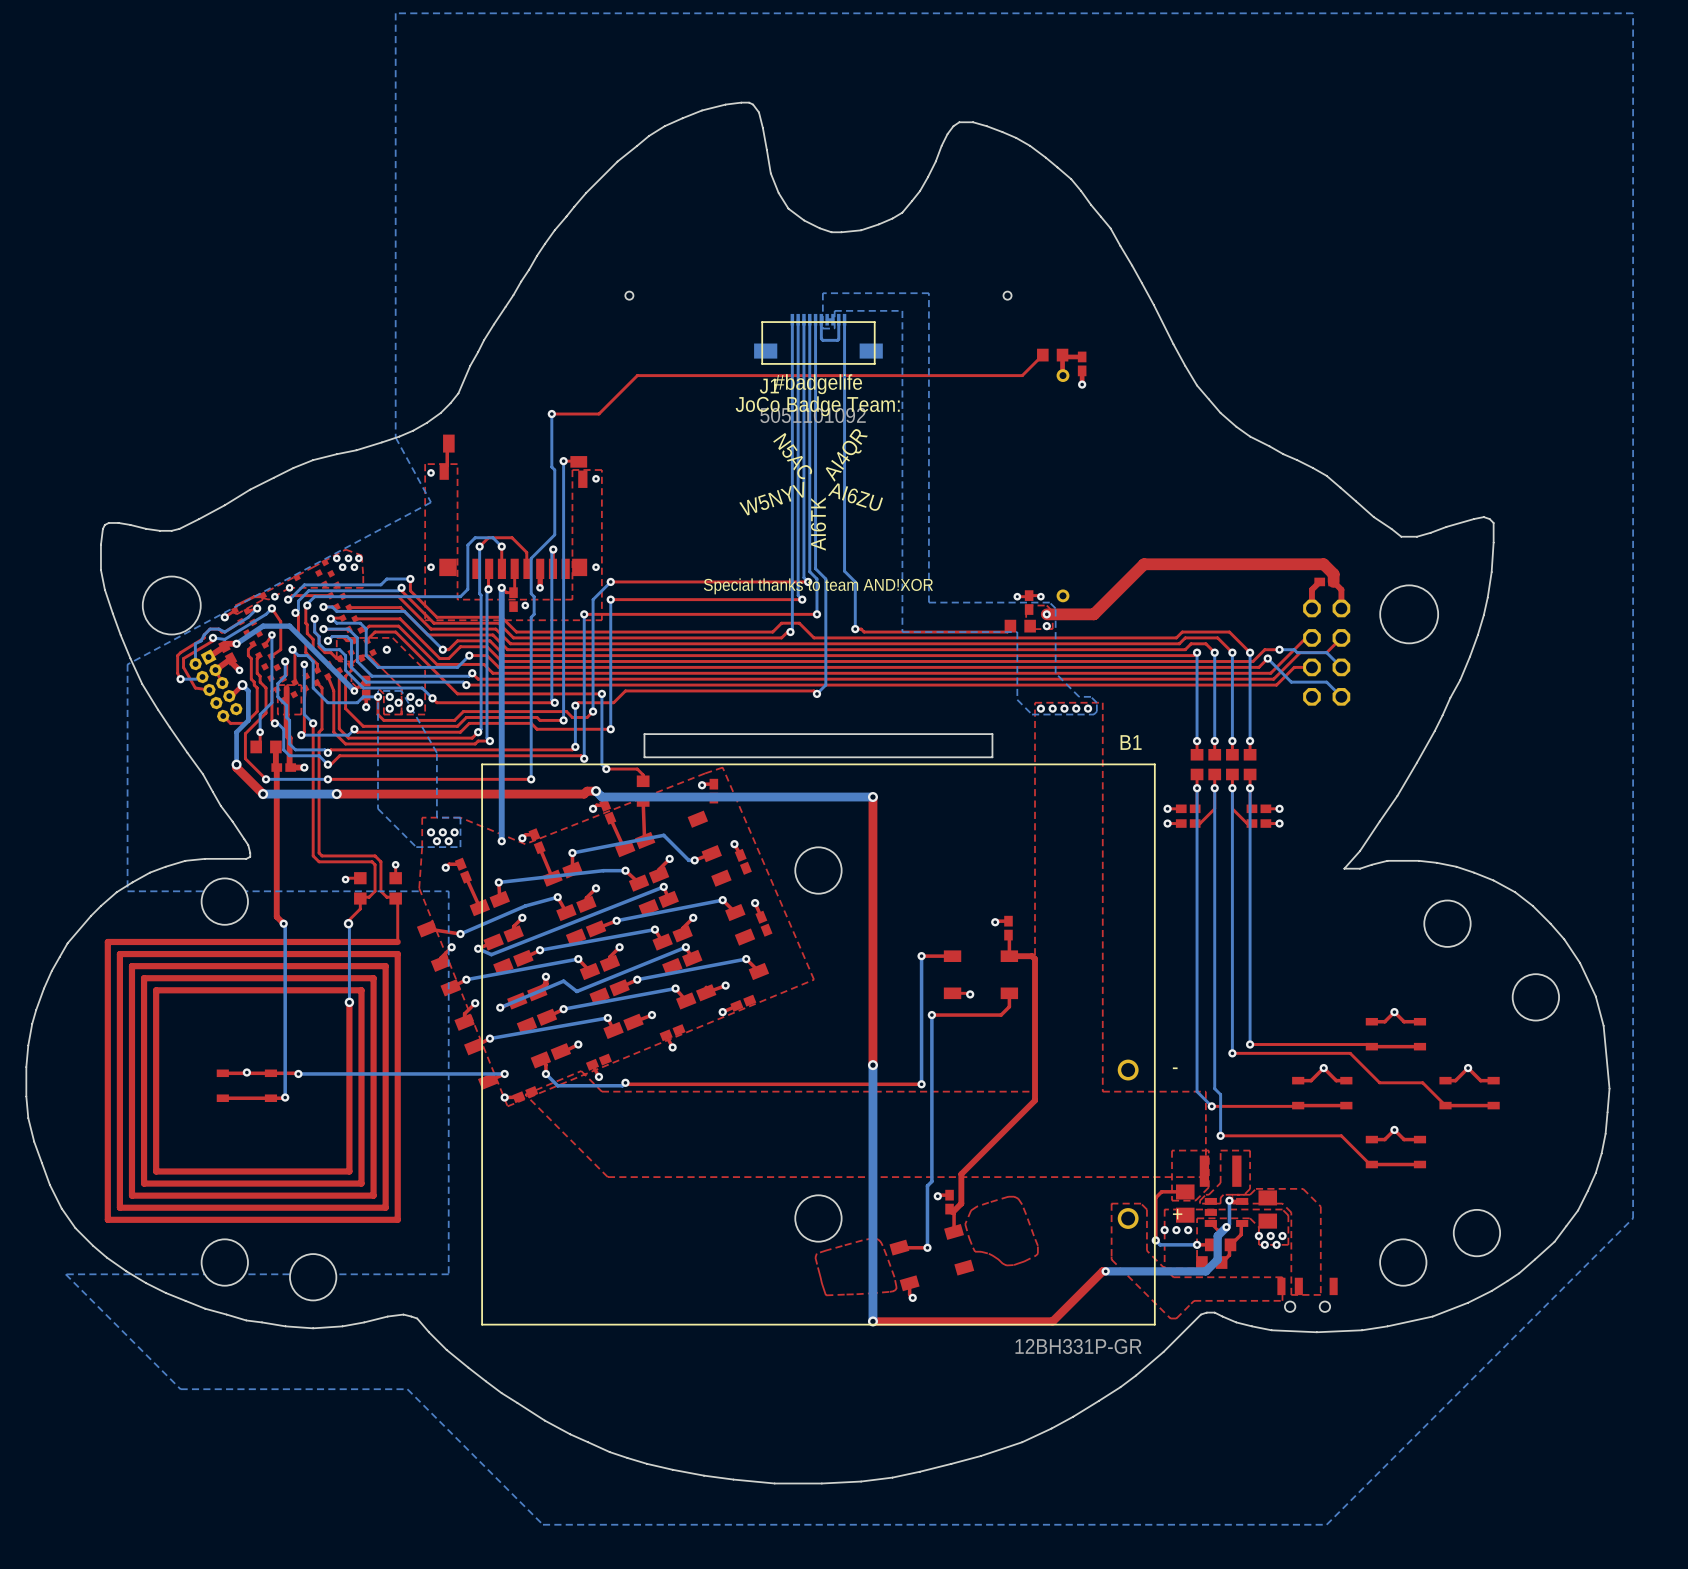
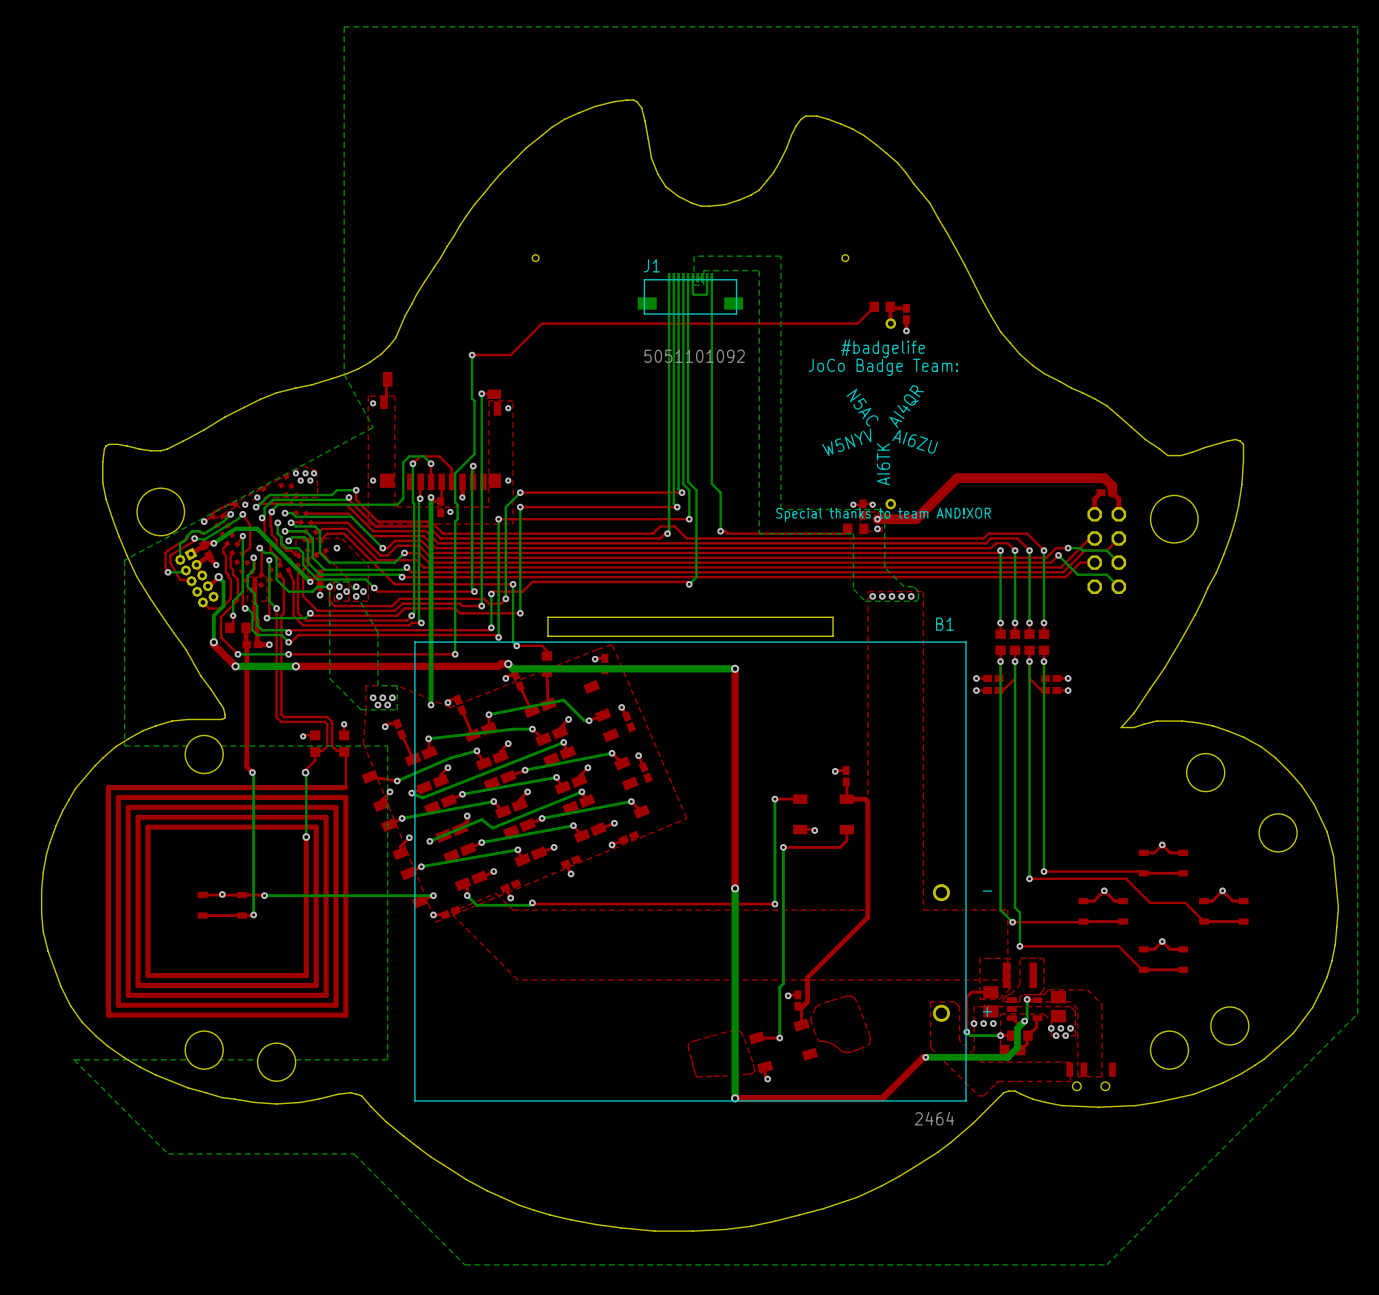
text position: #badgelife (818, 384) -> #badgelife (883, 348)
J1 name position: J1 (769, 386) -> J1 (651, 265)
text position: JoCo Badge Team: (817, 406) -> JoCo Badge Team: (883, 367)
text position: AI4QR (846, 455) -> AI4QR (906, 406)
text position: N5AC (792, 456) -> N5AC (862, 407)
text position: AI6ZU (855, 497) -> AI6ZU (915, 441)
text position: W5NYV (771, 498) -> W5NYV (846, 442)
text position: AI6TK (818, 523) -> AI6TK (883, 464)
text position: Special thanks to team AND!XOR (818, 586) -> Special thanks to team AND!XOR (883, 514)
B1 footprint: [481, 763, 1156, 1326] -> [414, 641, 967, 1102]
B1 value: 12BH331P-GR (1078, 1346) -> 2464 (934, 1118)

